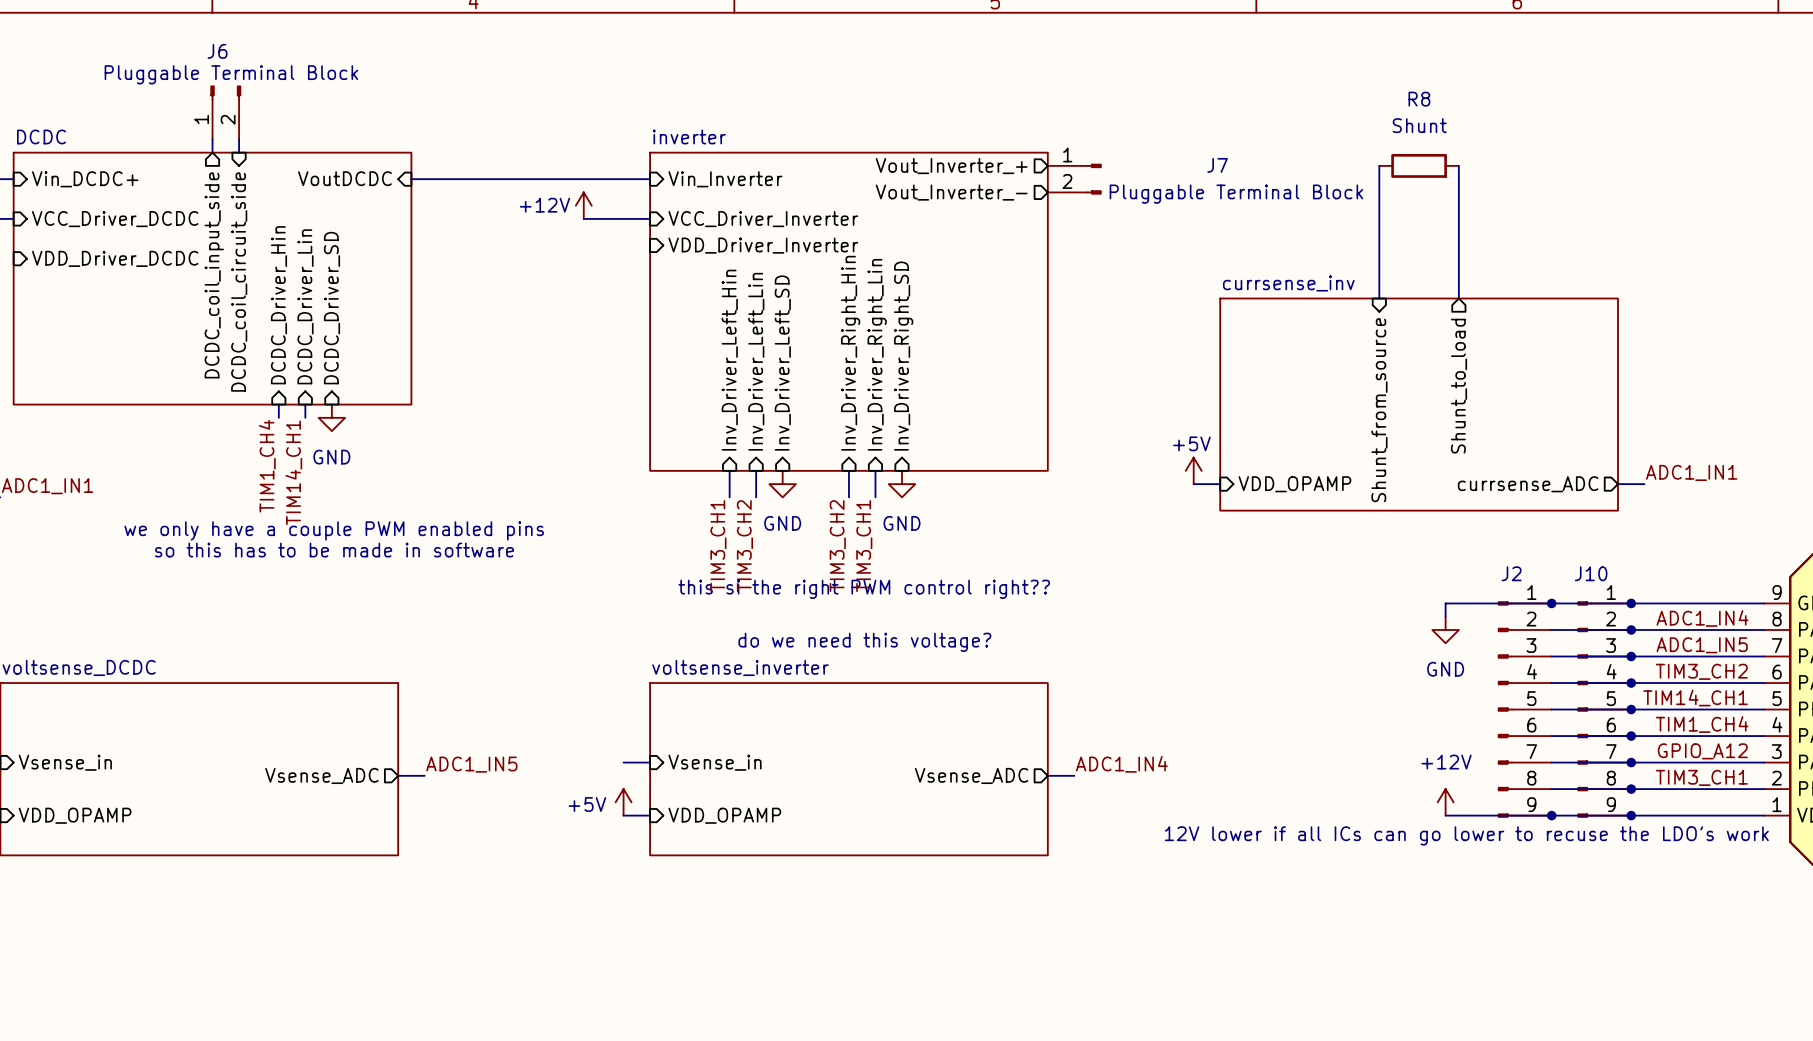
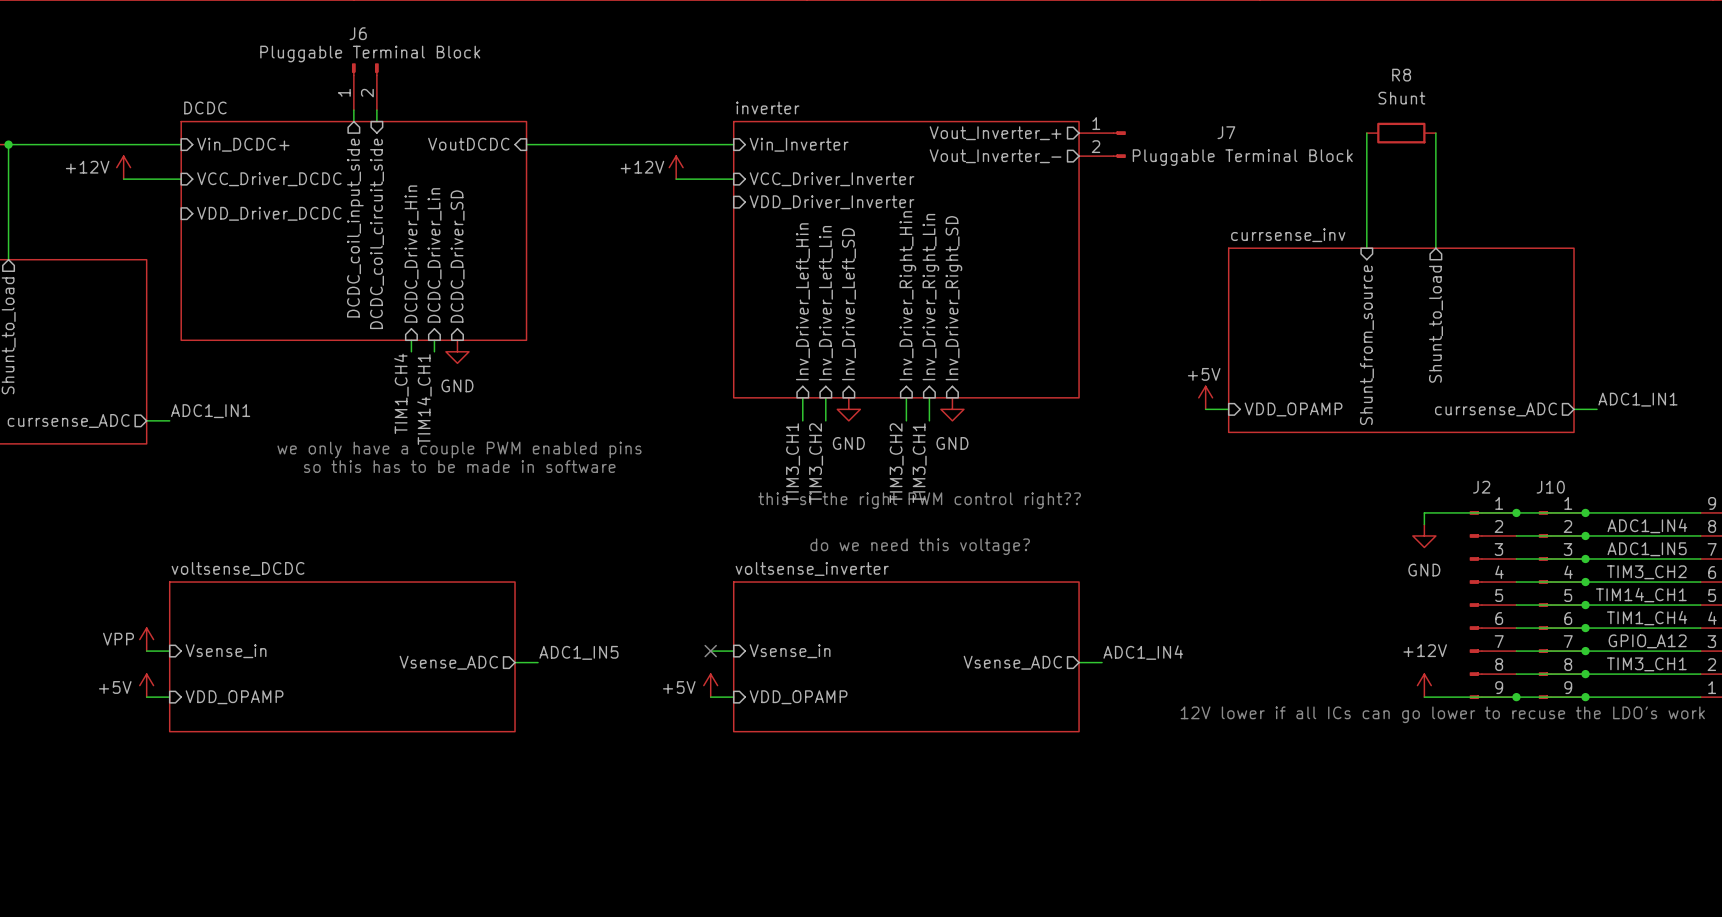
no-connect mark: none -> (710, 651)

